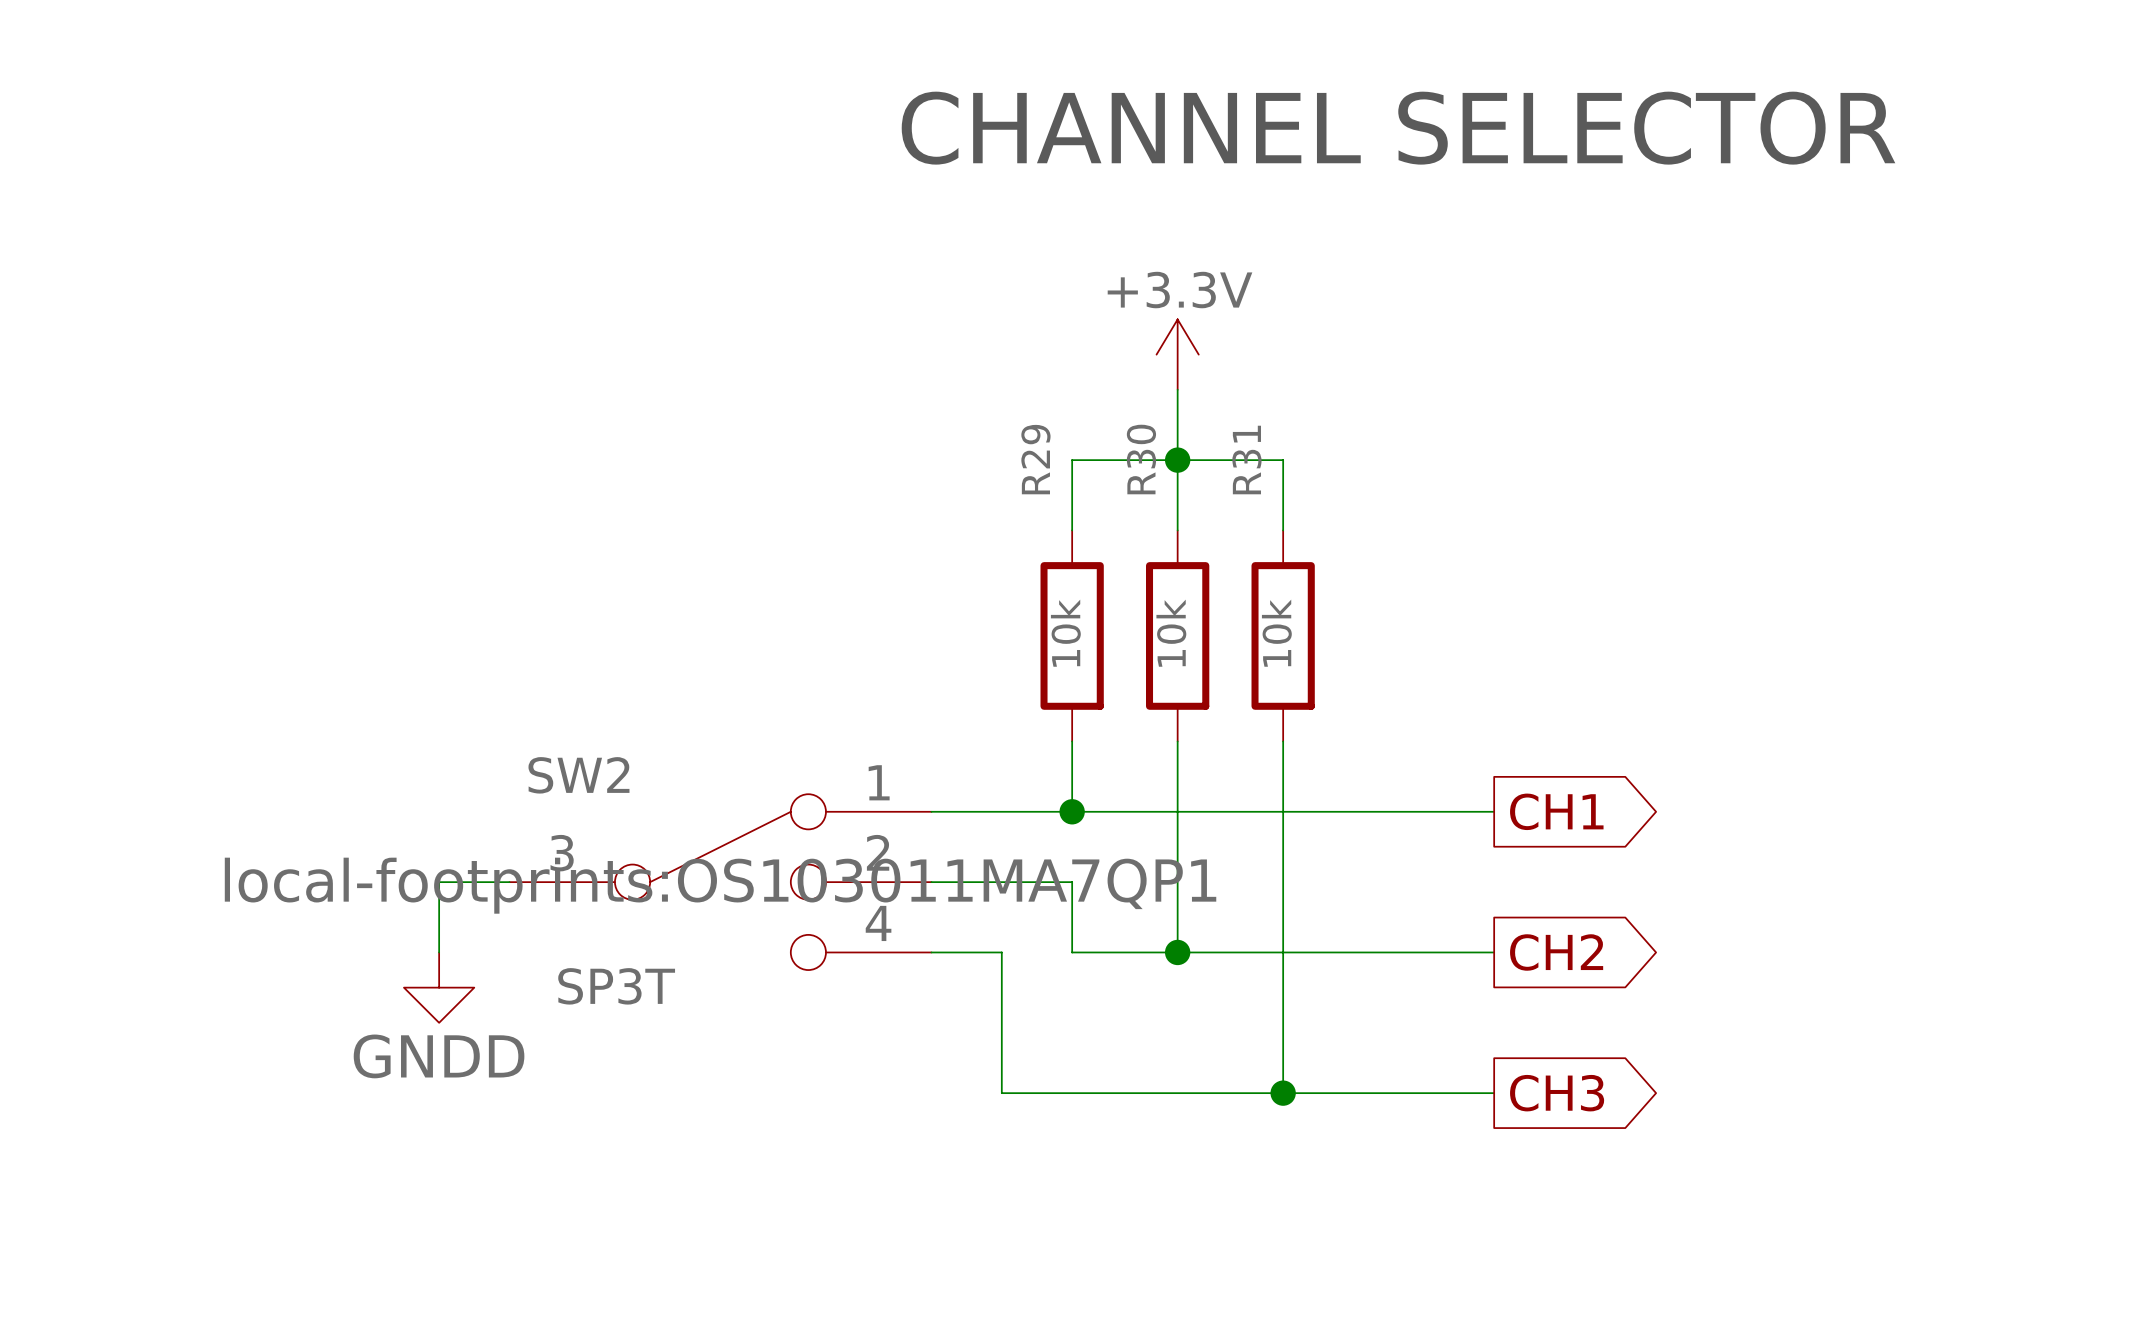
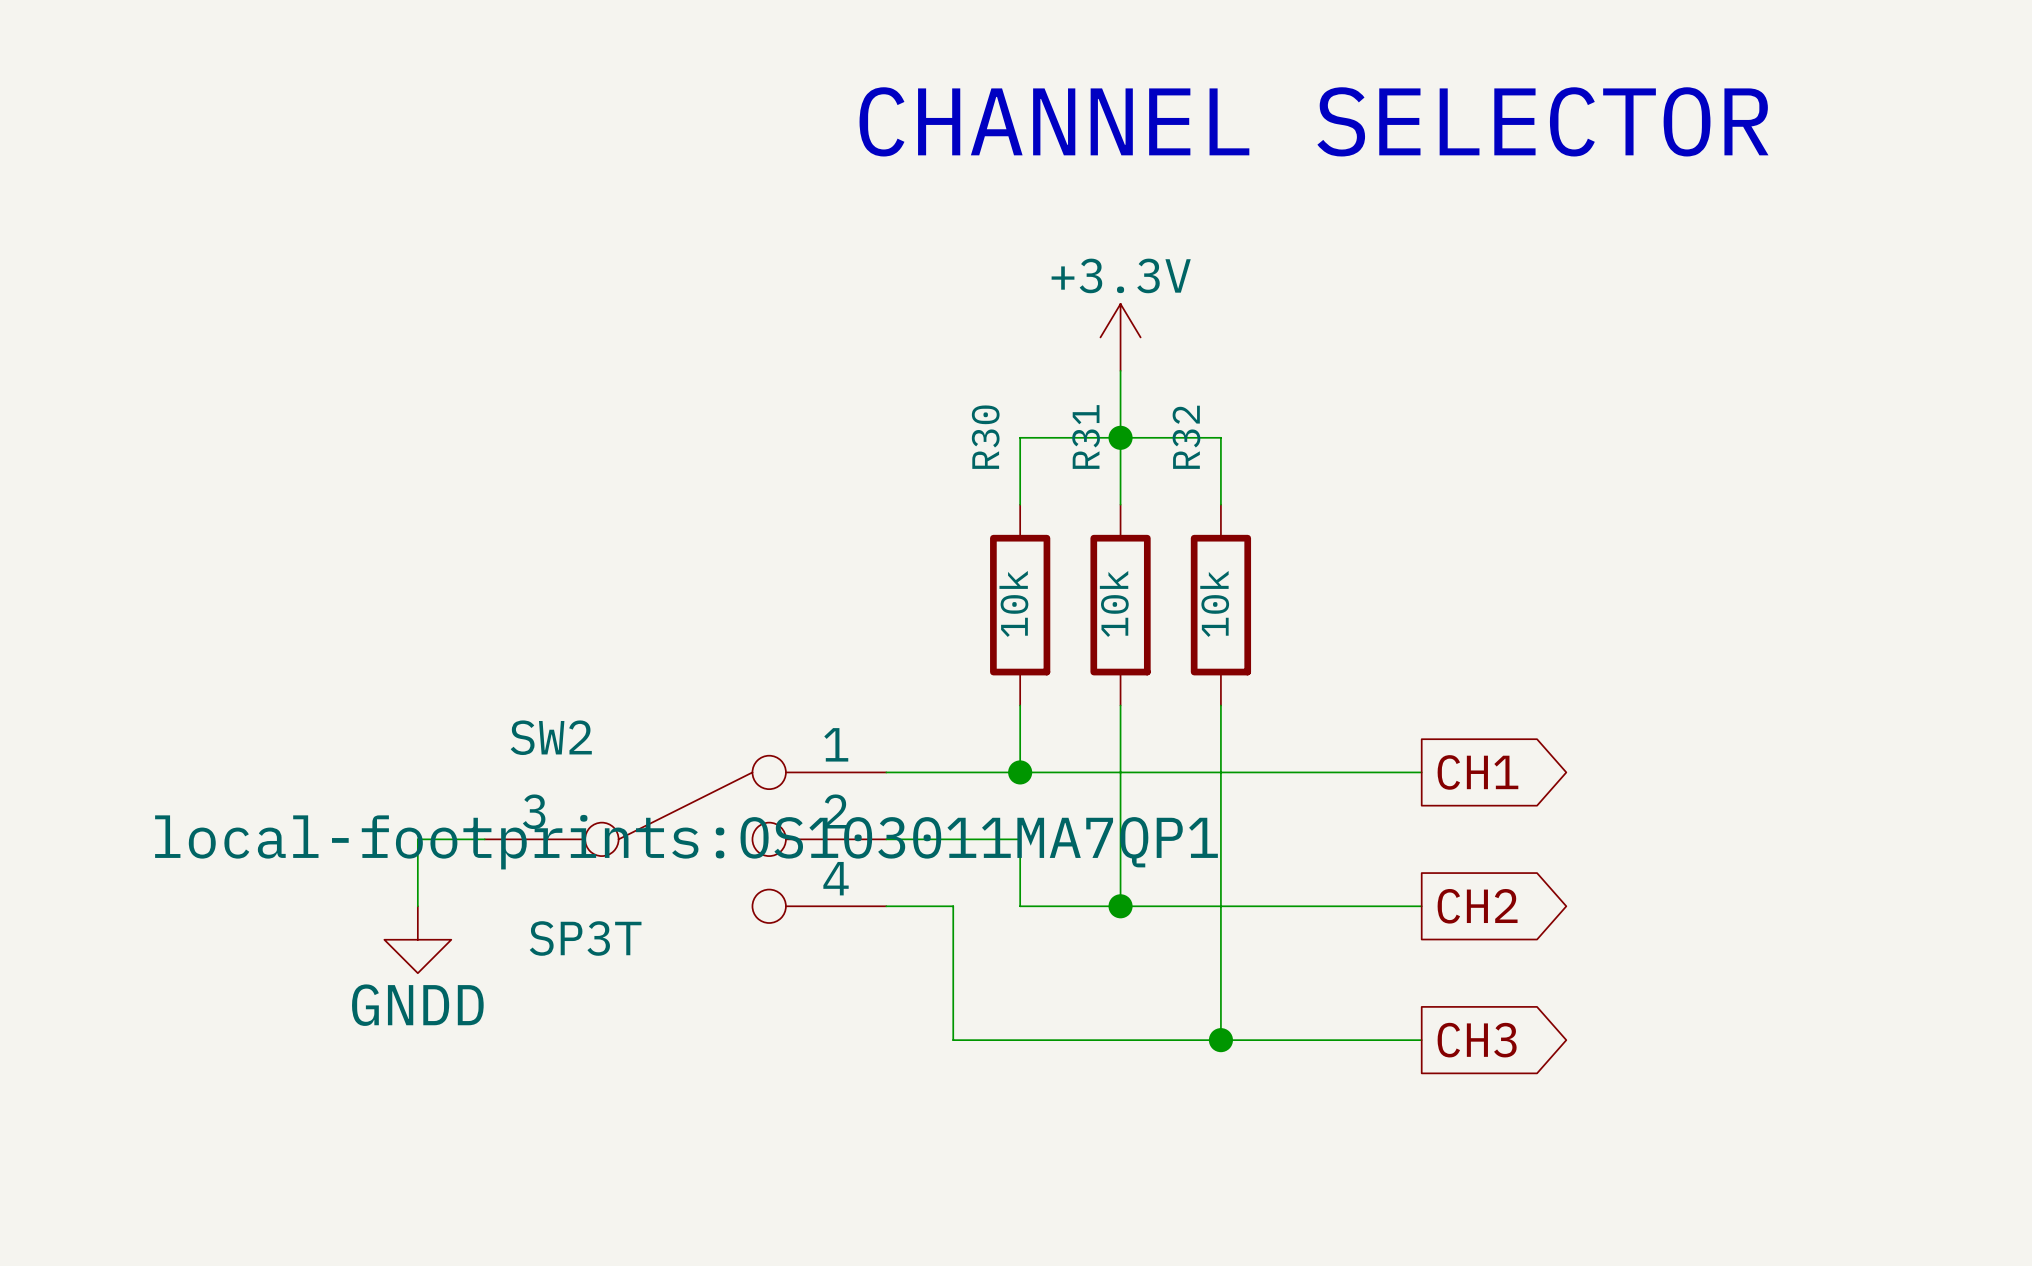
R29 name: R29 (1035, 459) -> R30 (985, 437)
R30 name: R30 (1141, 459) -> R31 (1086, 436)
R31 name: R31 (1246, 460) -> R32 (1186, 437)

